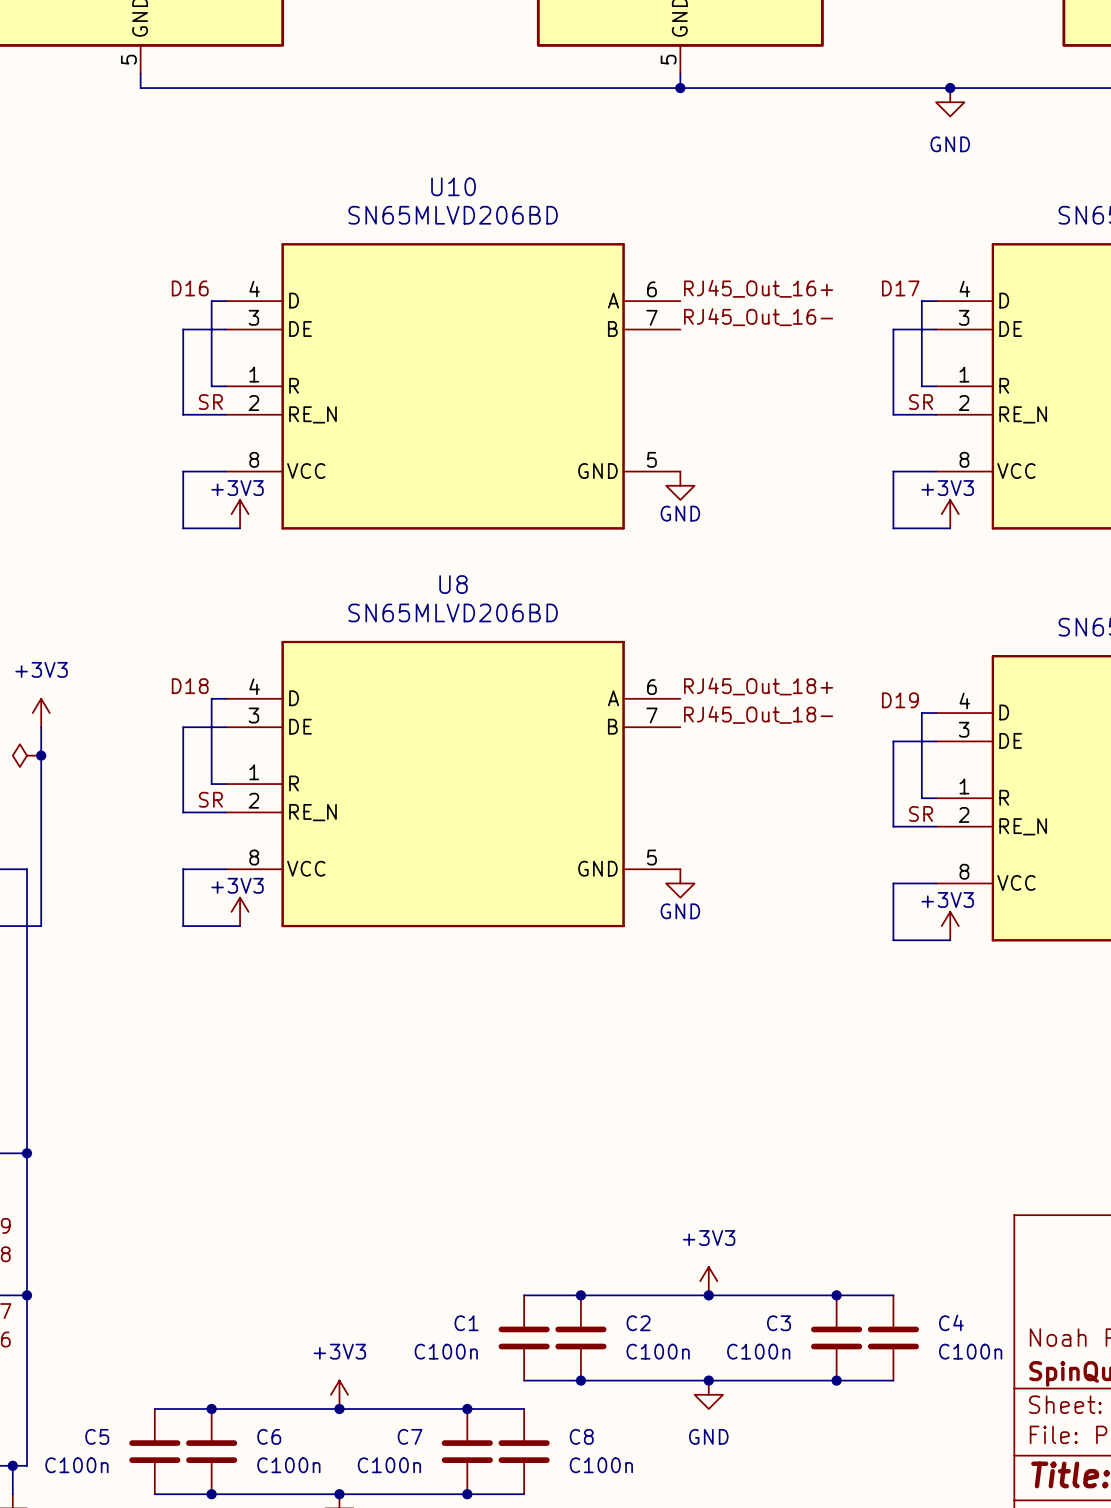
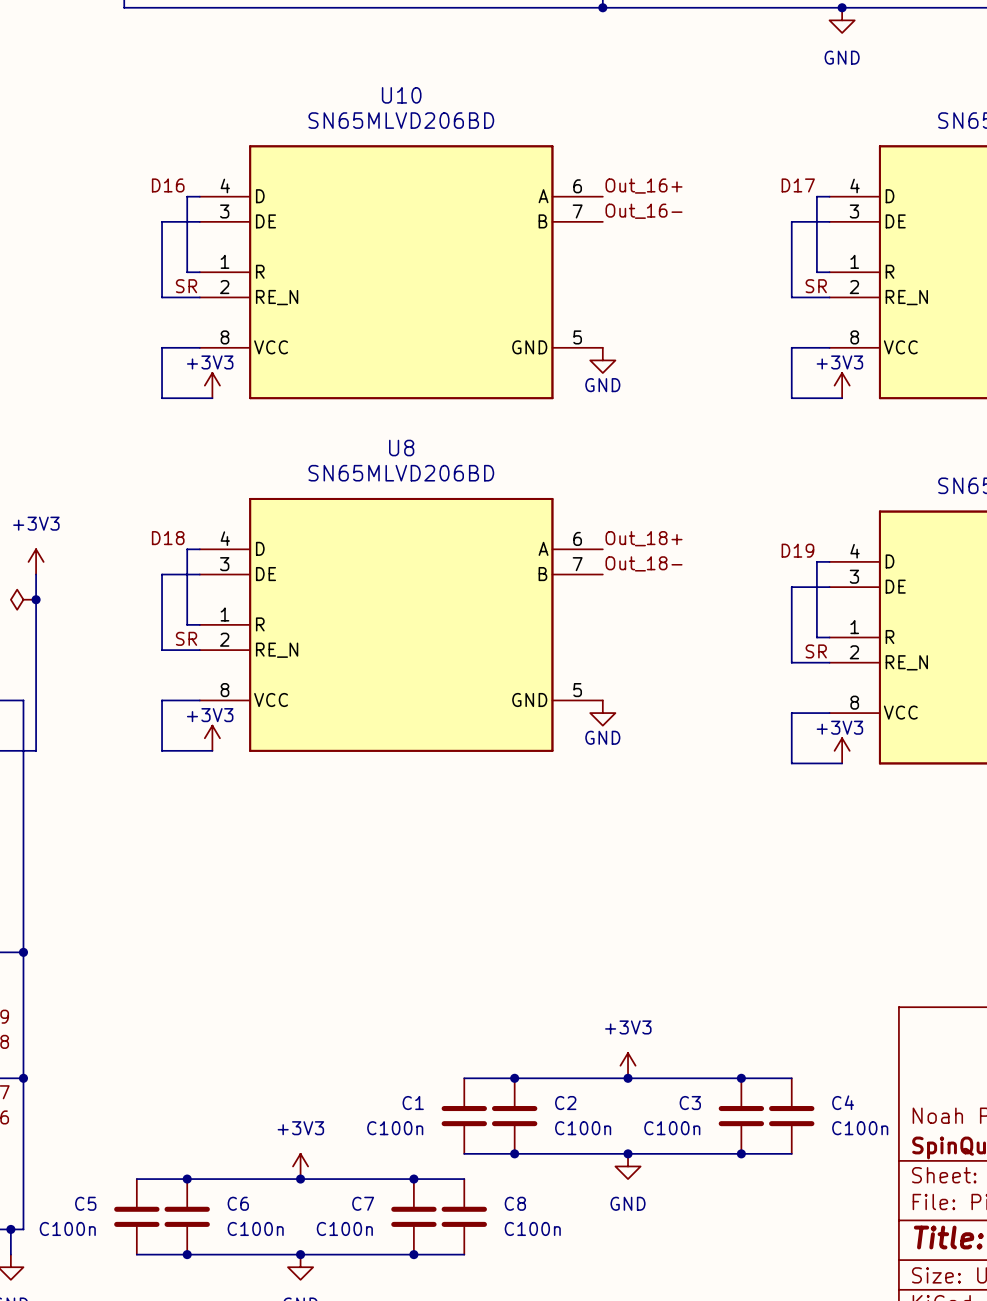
label: RJ45_Out_16+ (758, 288) -> Out_16+ (644, 186)
label: RJ45_Out_16- (758, 317) -> Out_16- (644, 211)
label: RJ45_Out_18+ (758, 686) -> Out_18+ (644, 538)
label: RJ45_Out_18- (758, 714) -> Out_18- (644, 563)

